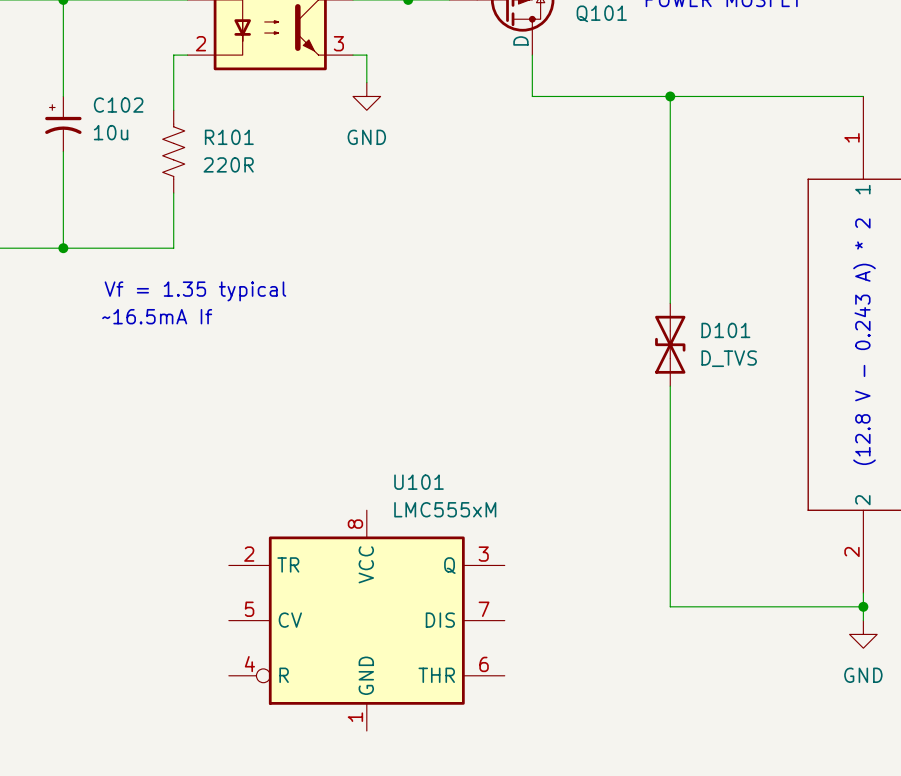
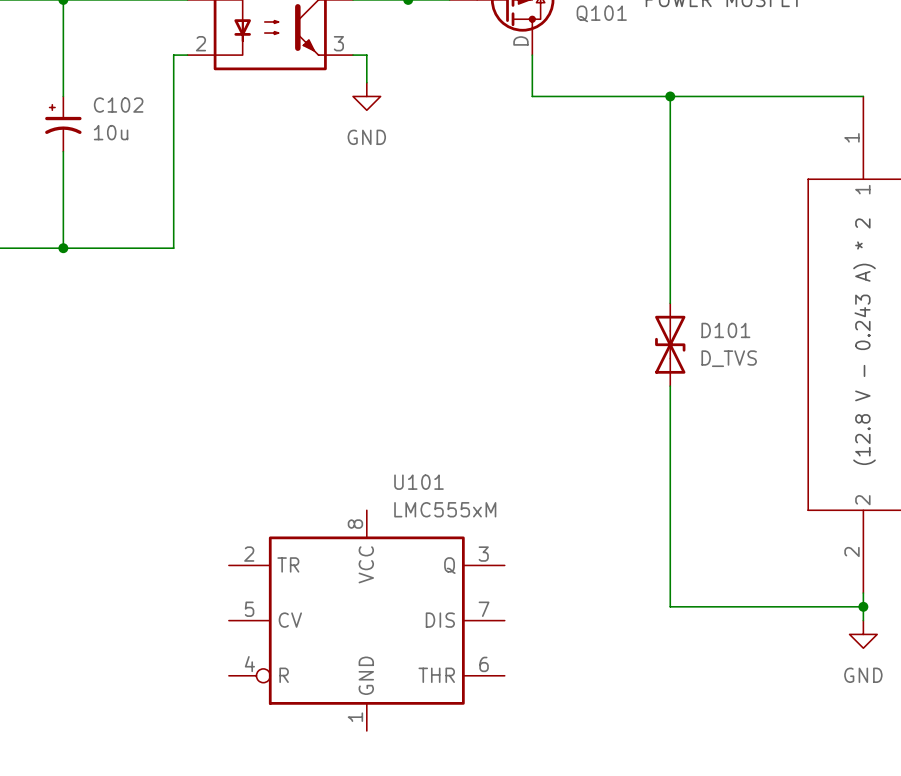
R101: 220R (173, 151) -> none
text: Vf = 1.35 typical (195, 291) -> none
text: ~16.5mA If (157, 316) -> none

